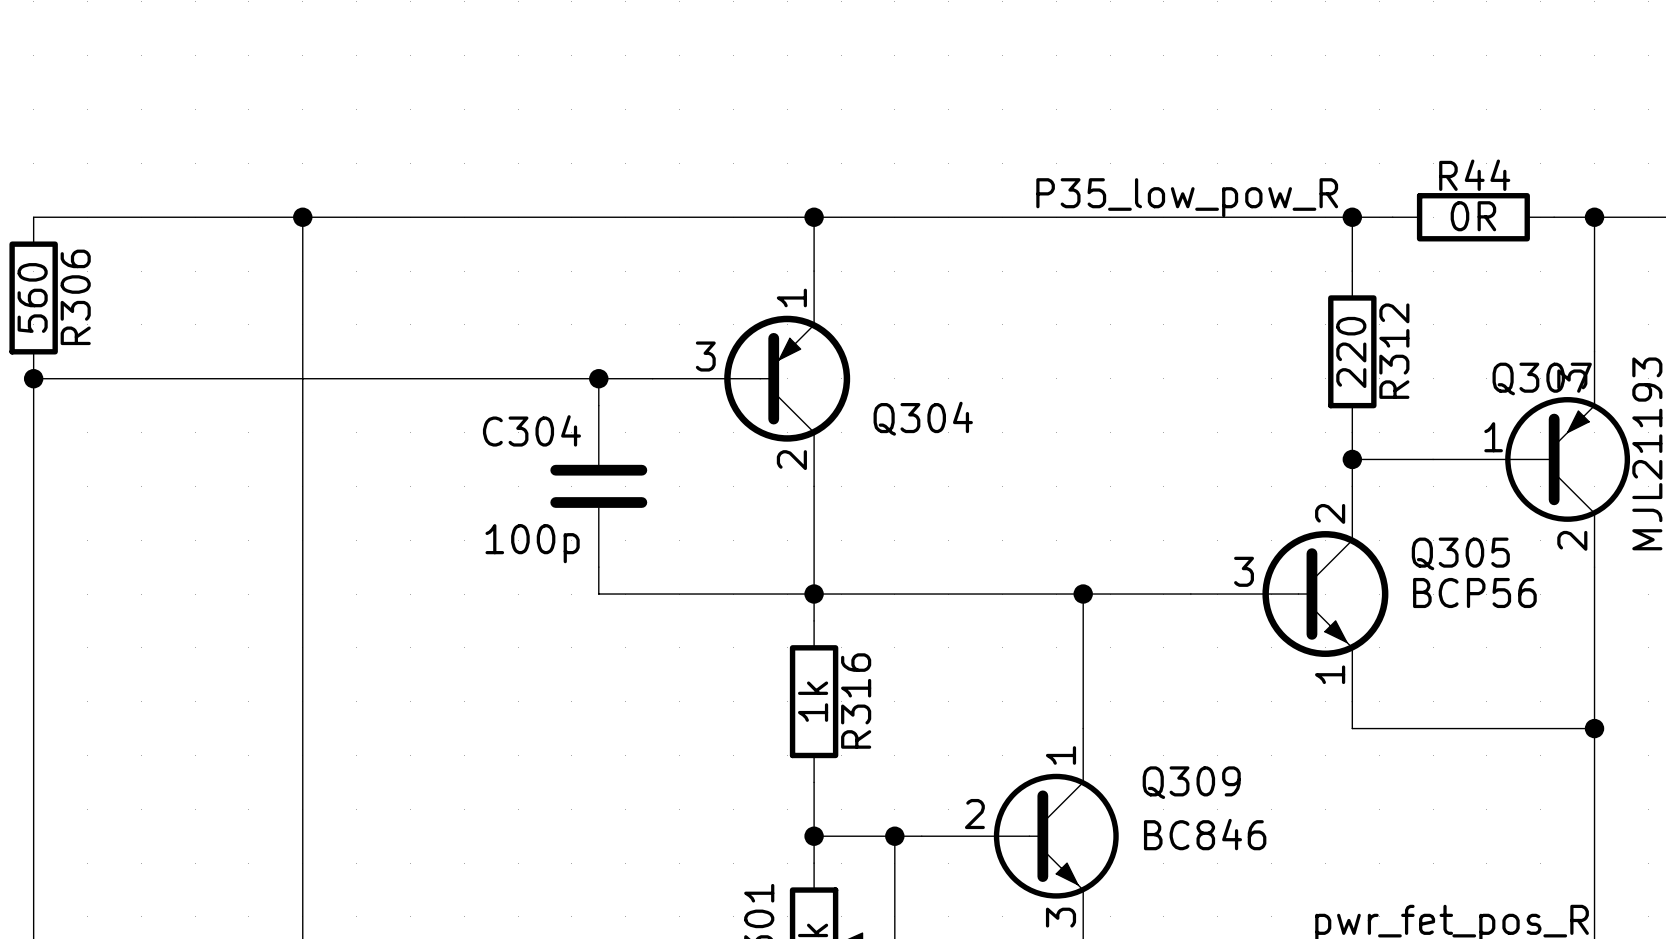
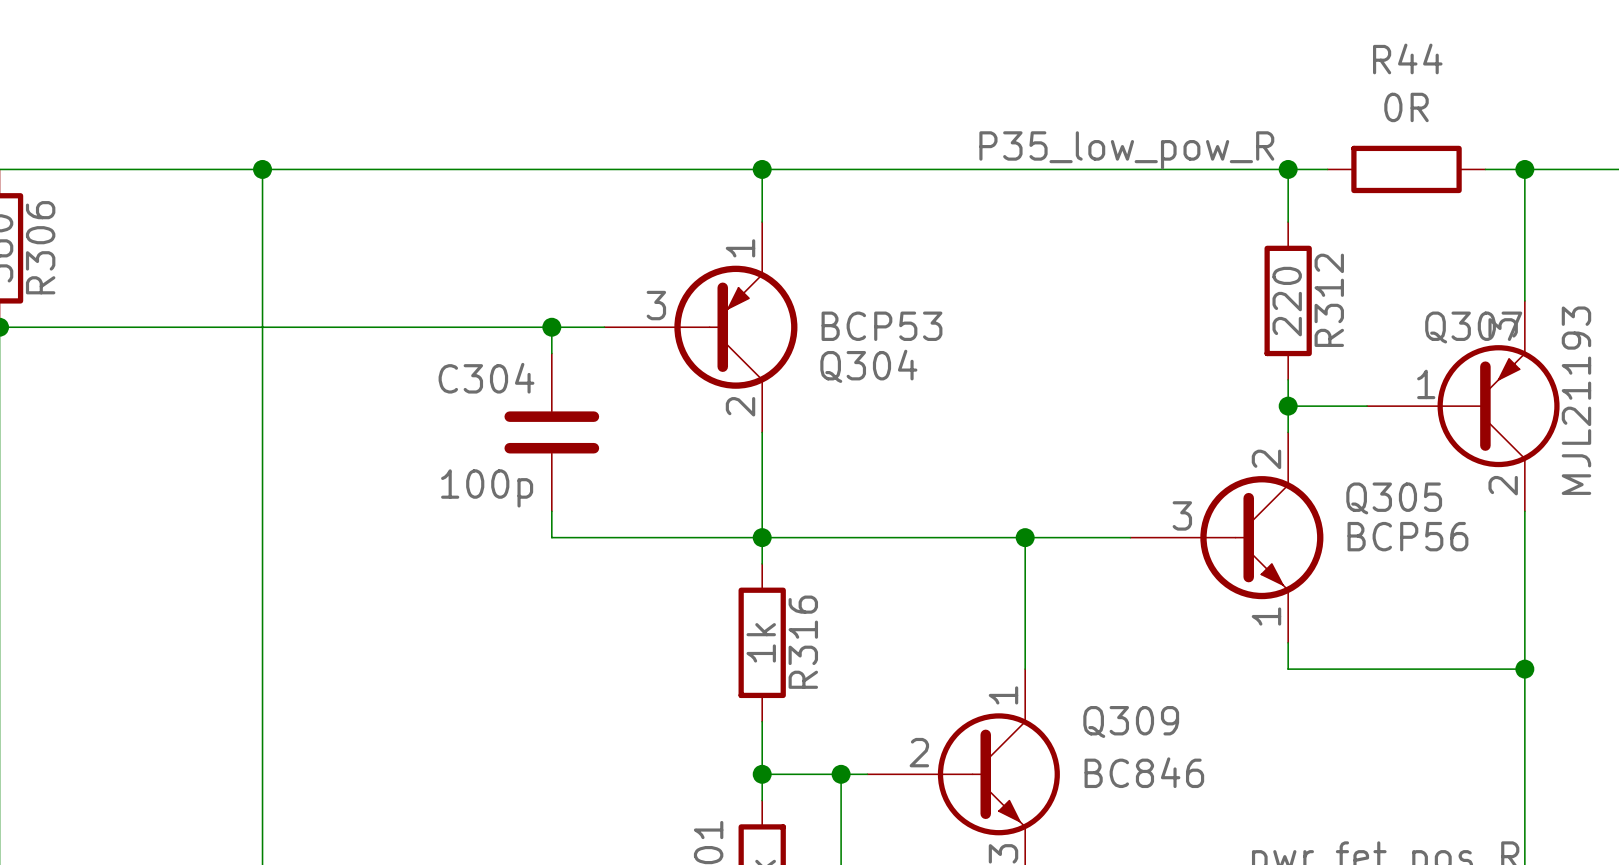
R44 name position: R44 (1474, 175) -> R44 (1407, 58)
R44 value position: 0R (1473, 216) -> 0R (1406, 107)
Q304 value: none -> BCP53 (881, 326)

